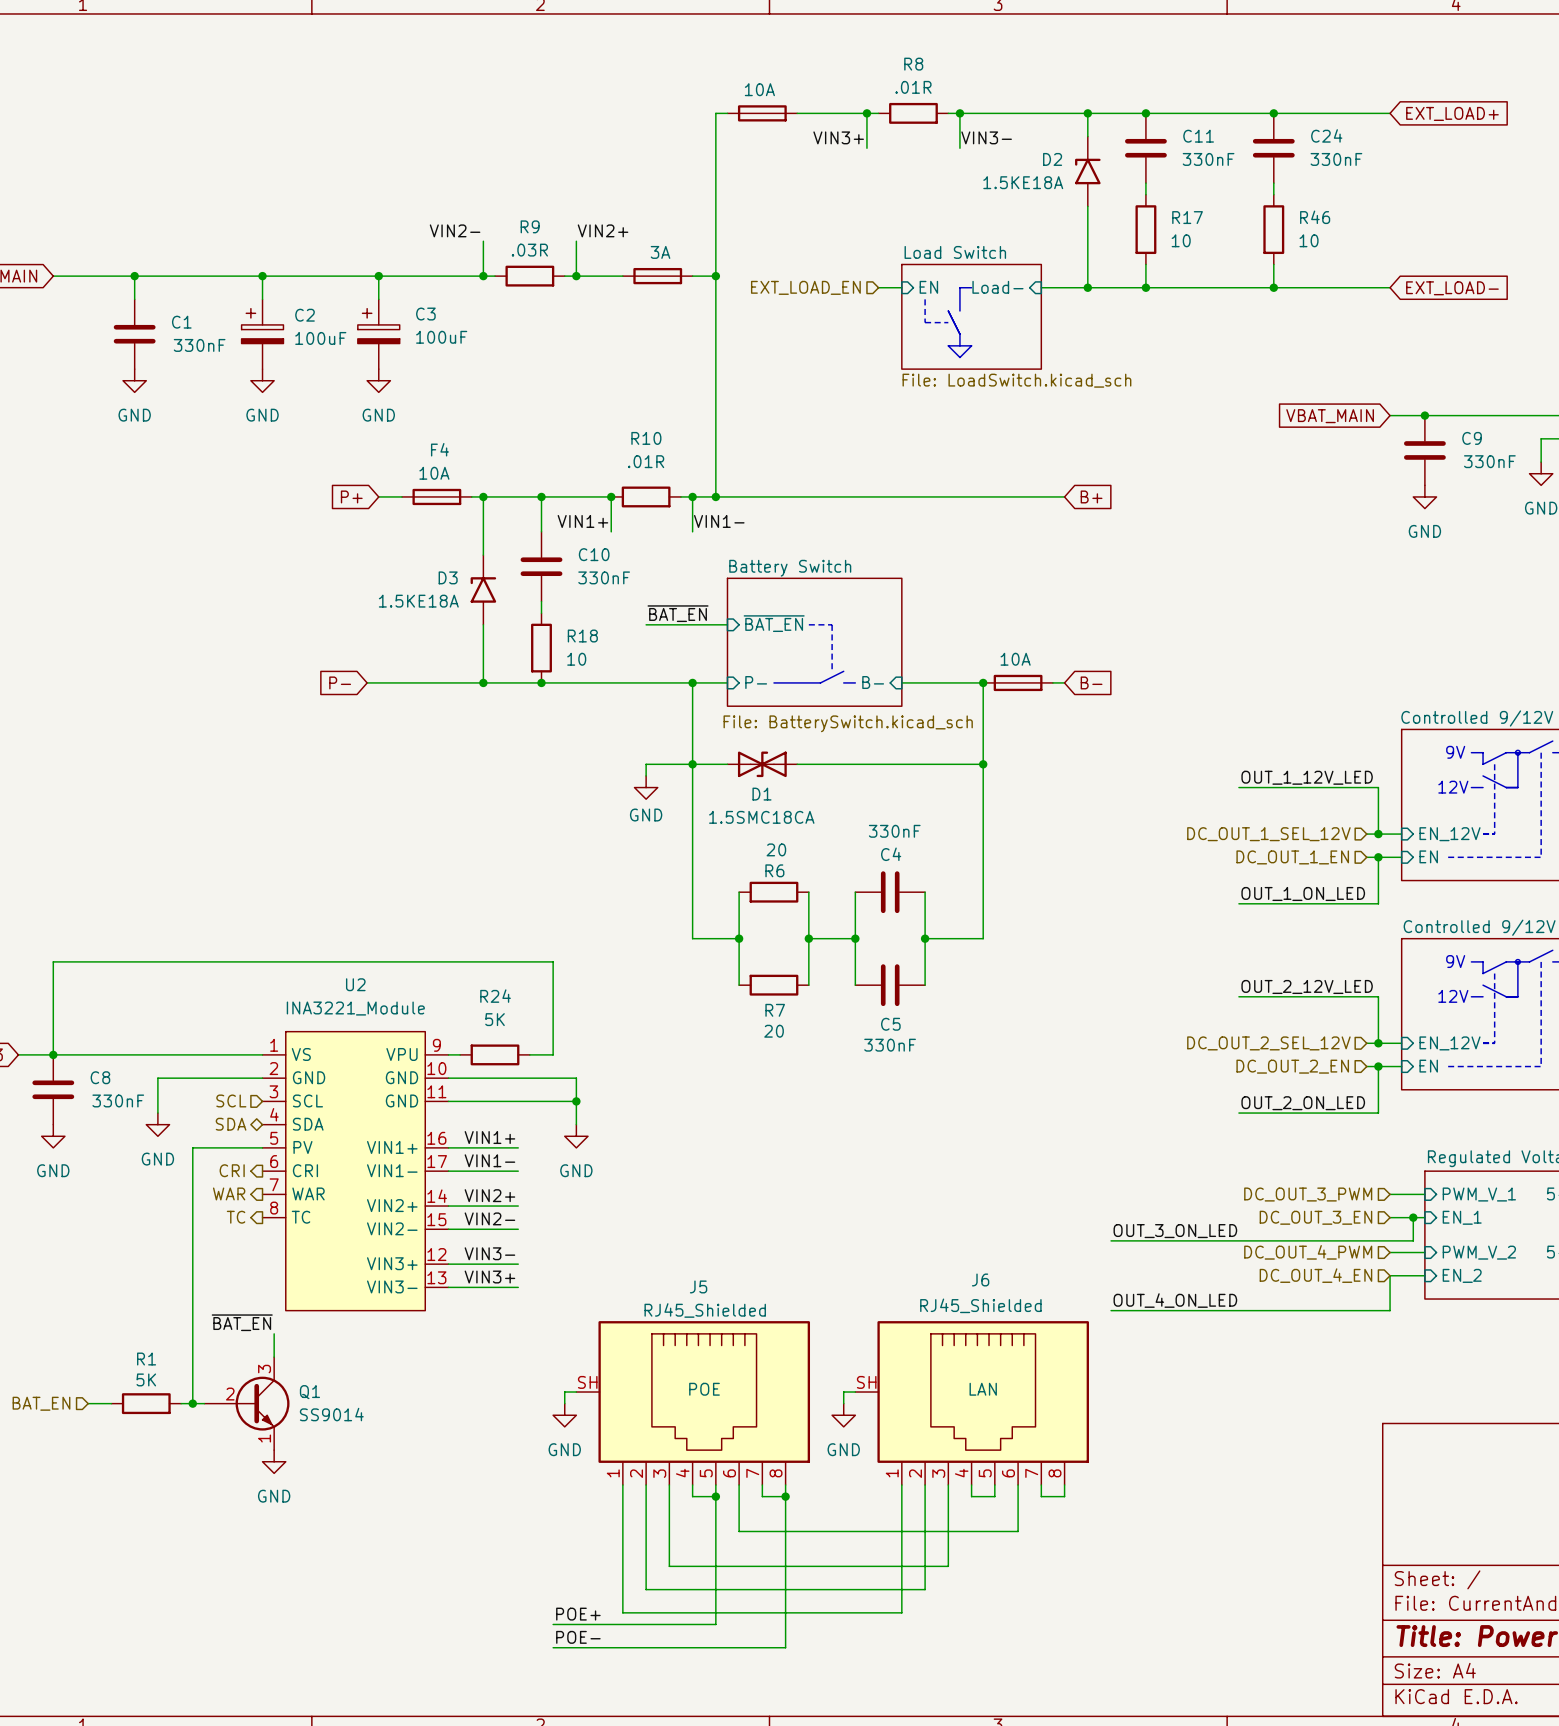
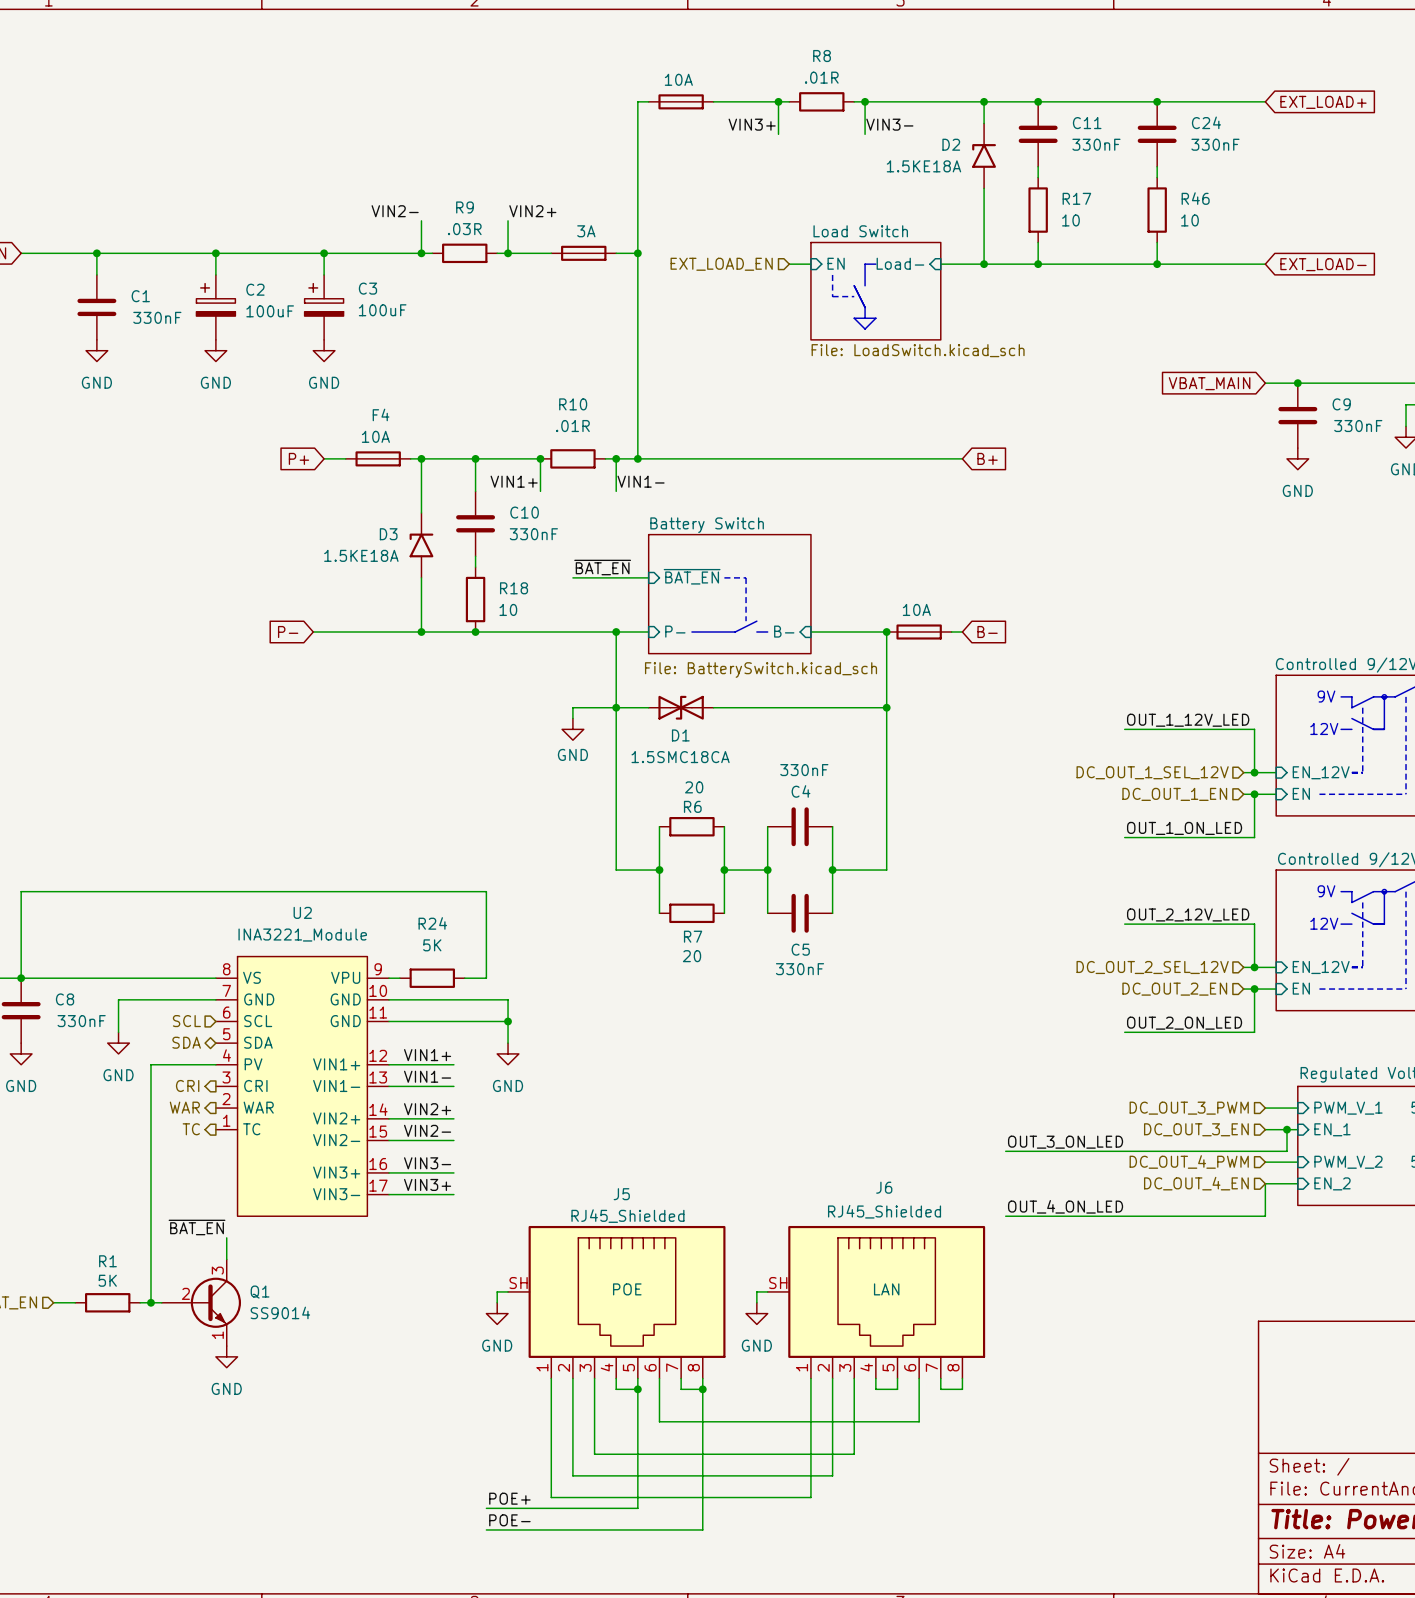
U2 symbol: [262, 1031, 449, 1311] -> [215, 956, 390, 1217]

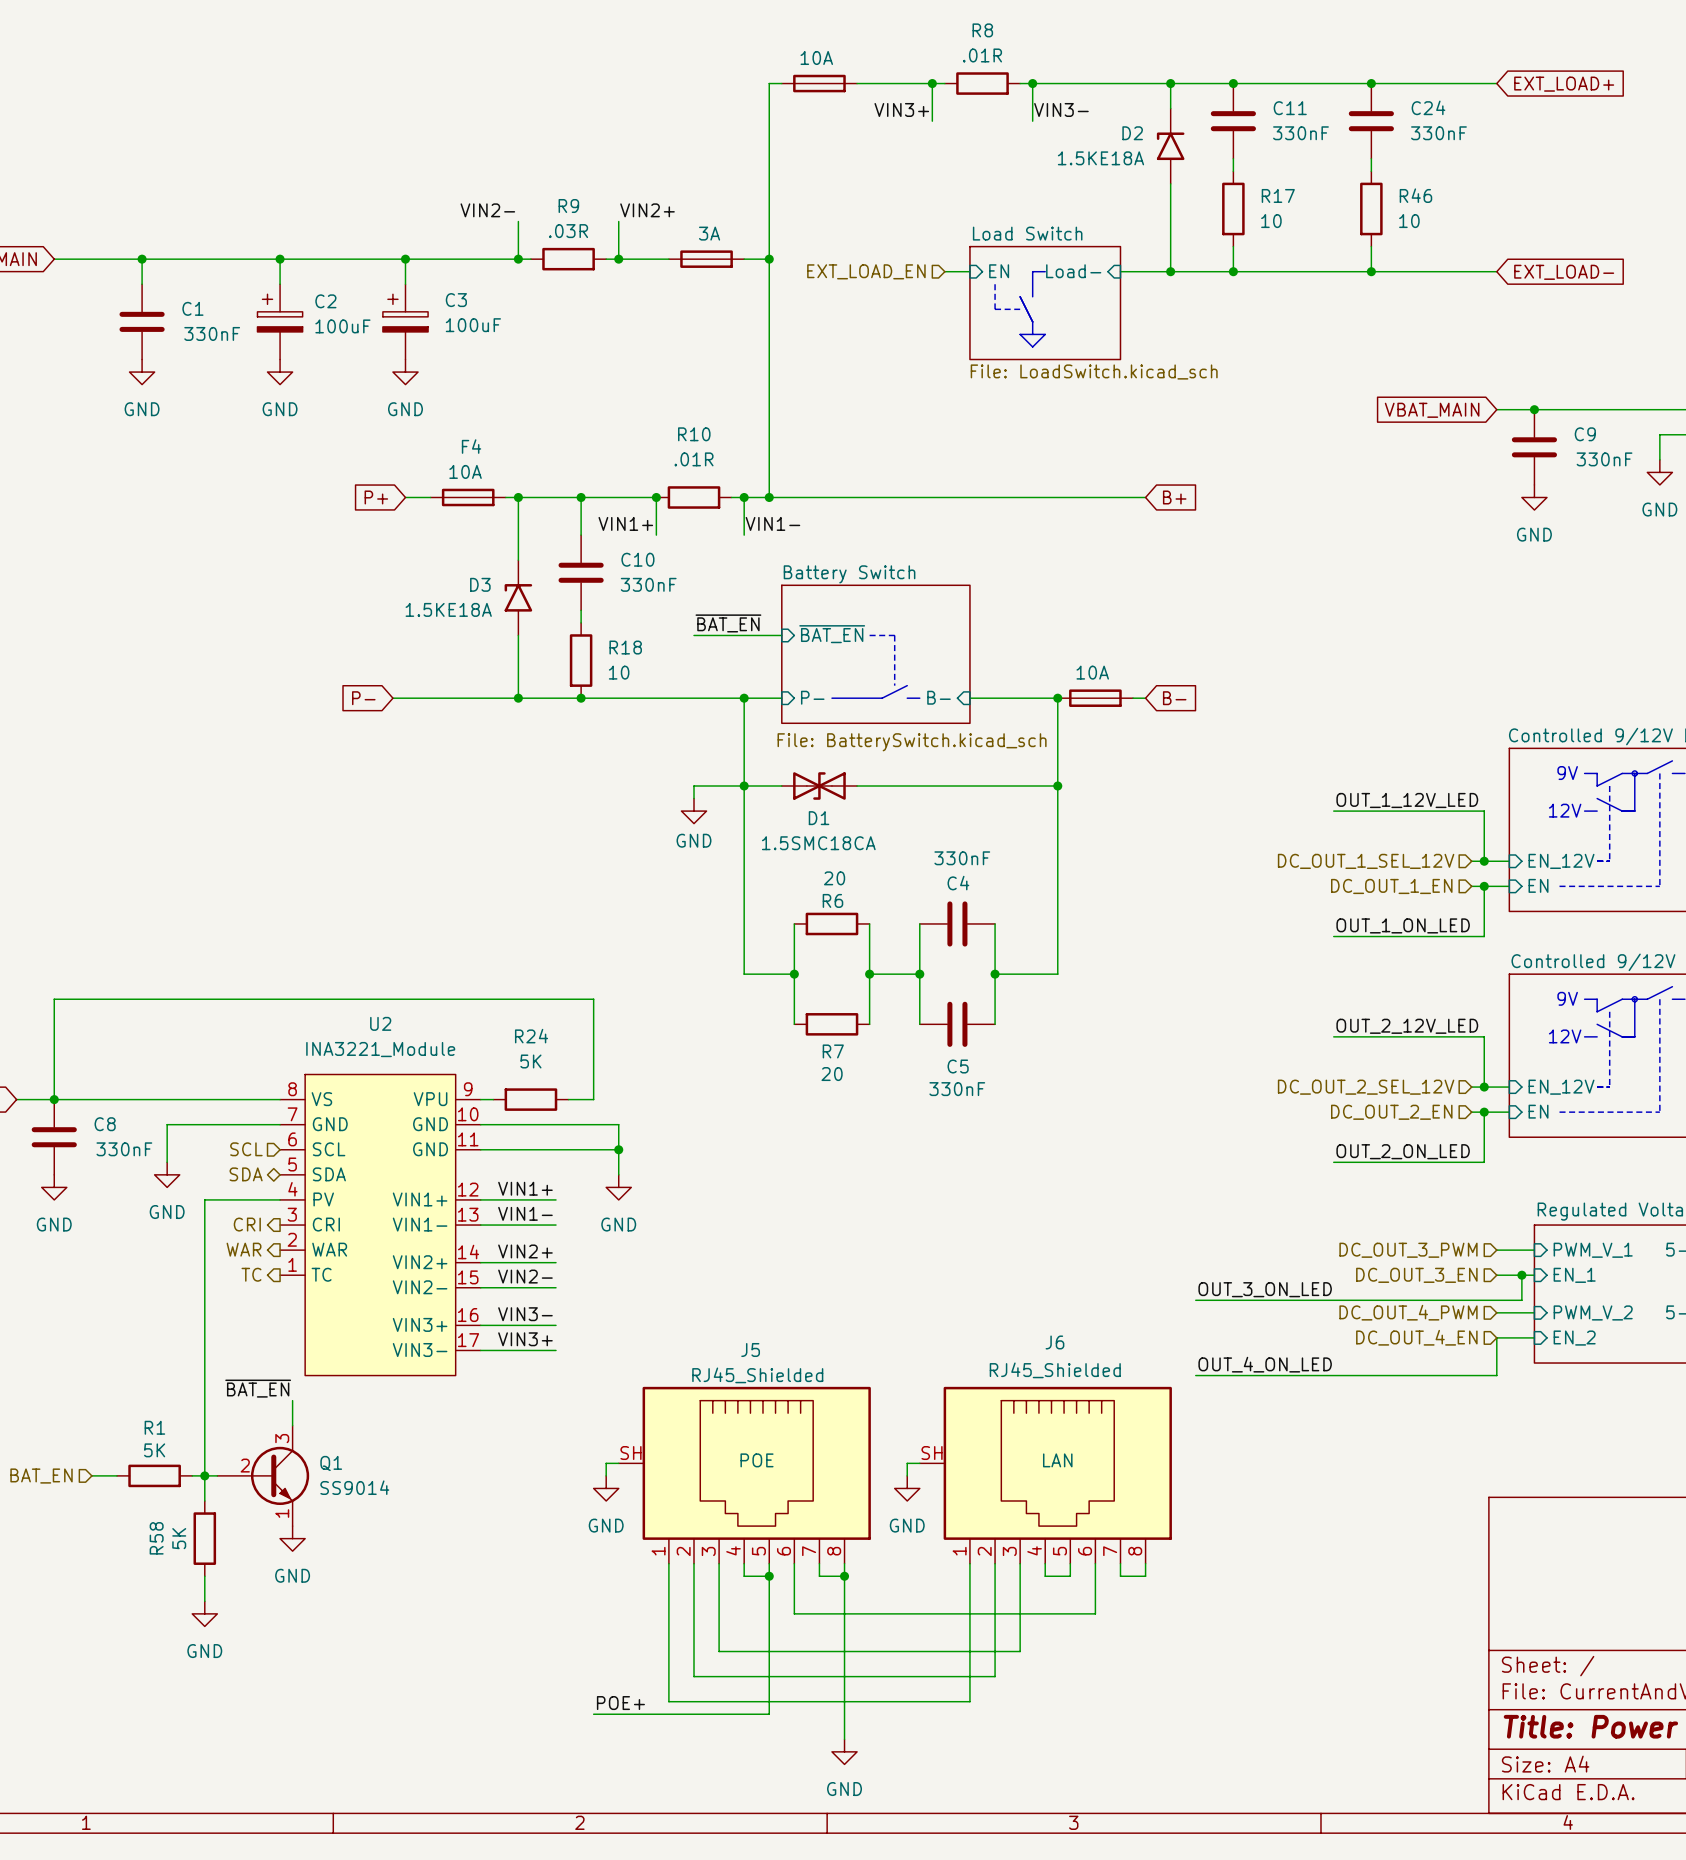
wire: none -> (204, 1475) (204, 1500)
R58: none -> 5K (204, 1538)
wire: none -> (204, 1576) (204, 1601)
power symbol: none -> GND (204, 1613)
label: POE- (509, 1520) -> none
wire: (486, 1529) (702, 1529) -> none
power symbol: none -> GND (844, 1751)

